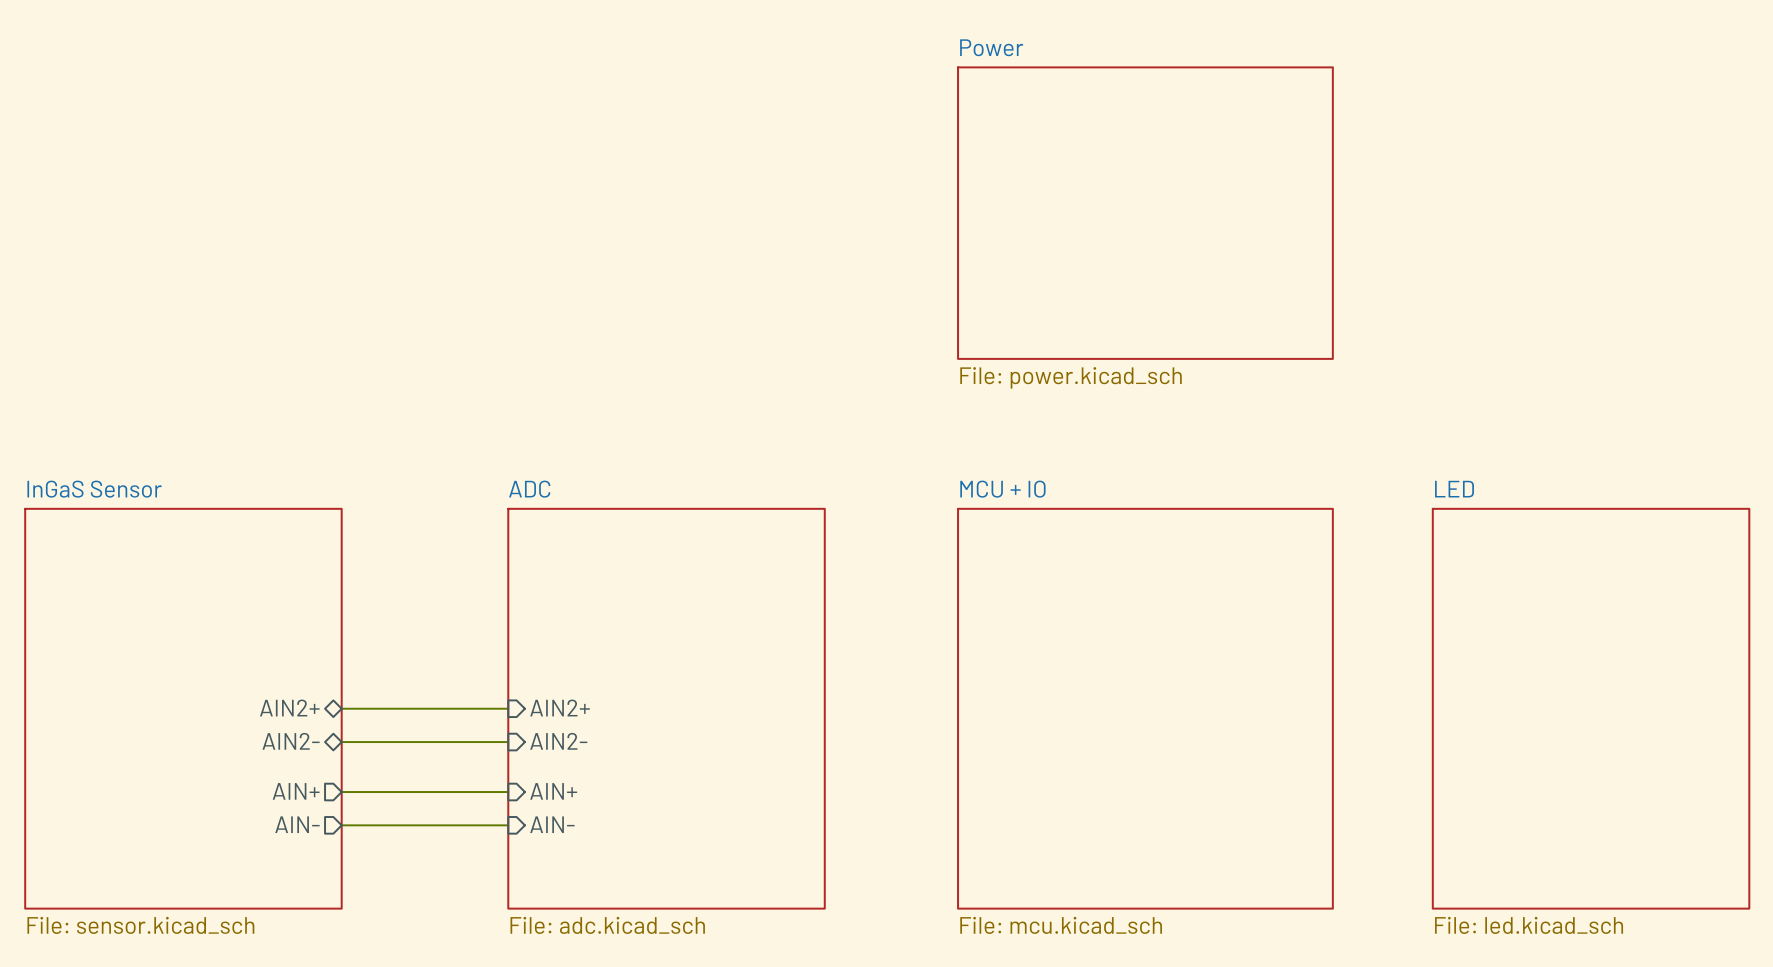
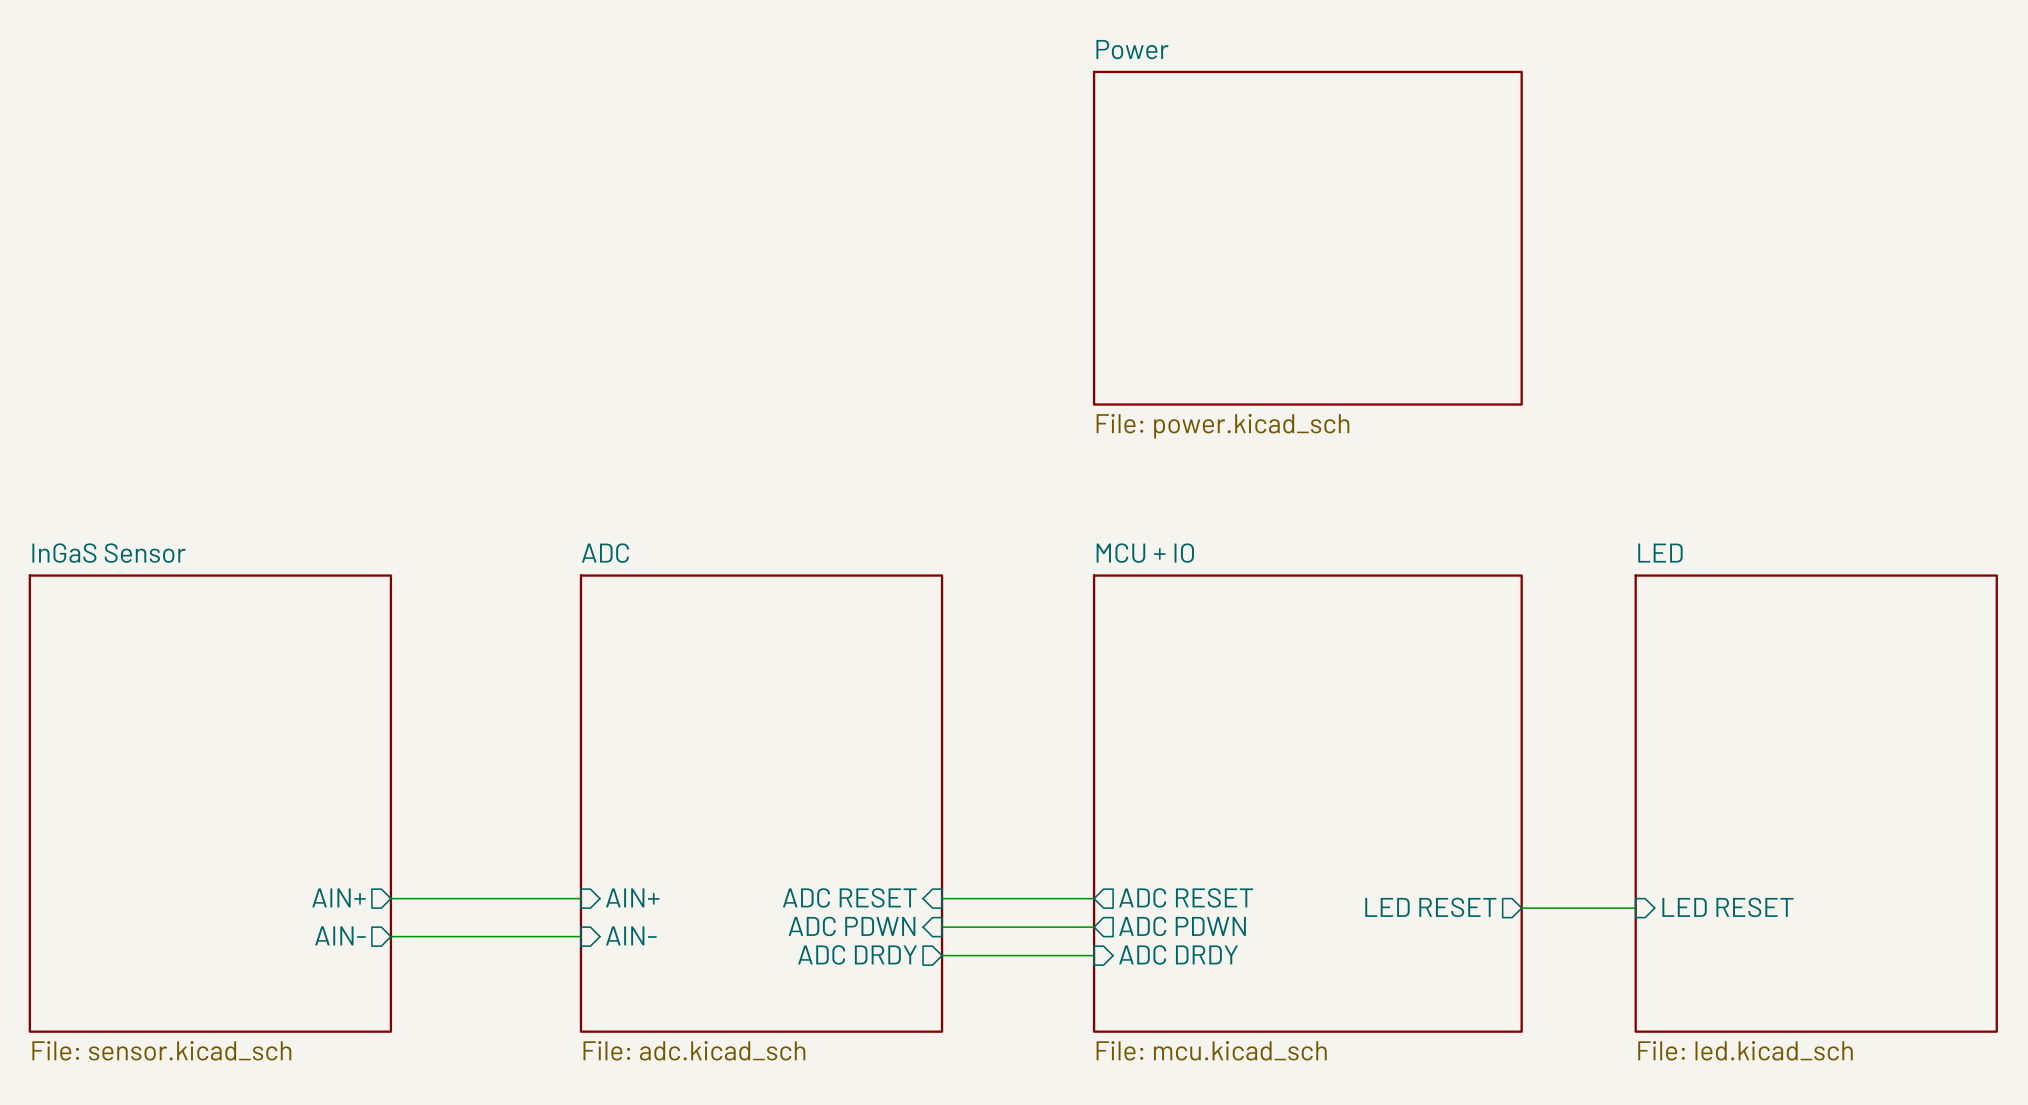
sheet pin: AIN2+ (289, 708) -> none
wire: (341, 708) (508, 708) -> none
sheet pin: AIN2+ (560, 708) -> none
sheet pin: AIN2- (291, 741) -> none
sheet pin: AIN2- (558, 741) -> none
wire: (341, 742) (508, 742) -> none
sheet pin: none -> ADC RESET (849, 897)
sheet pin: none -> ADC RESET (1186, 897)
wire: none -> (942, 898) (1094, 898)
sheet pin: none -> LED RESET (1430, 907)
sheet pin: none -> LED RESET (1727, 907)
wire: none -> (1521, 908) (1635, 908)
sheet pin: none -> ADC PDWN (851, 926)
sheet pin: none -> ADC PDWN (1182, 926)
wire: none -> (942, 927) (1094, 927)
sheet pin: none -> ADC DRDY (857, 954)
wire: none -> (942, 955) (1094, 955)
sheet pin: none -> ADC DRDY (1178, 954)

